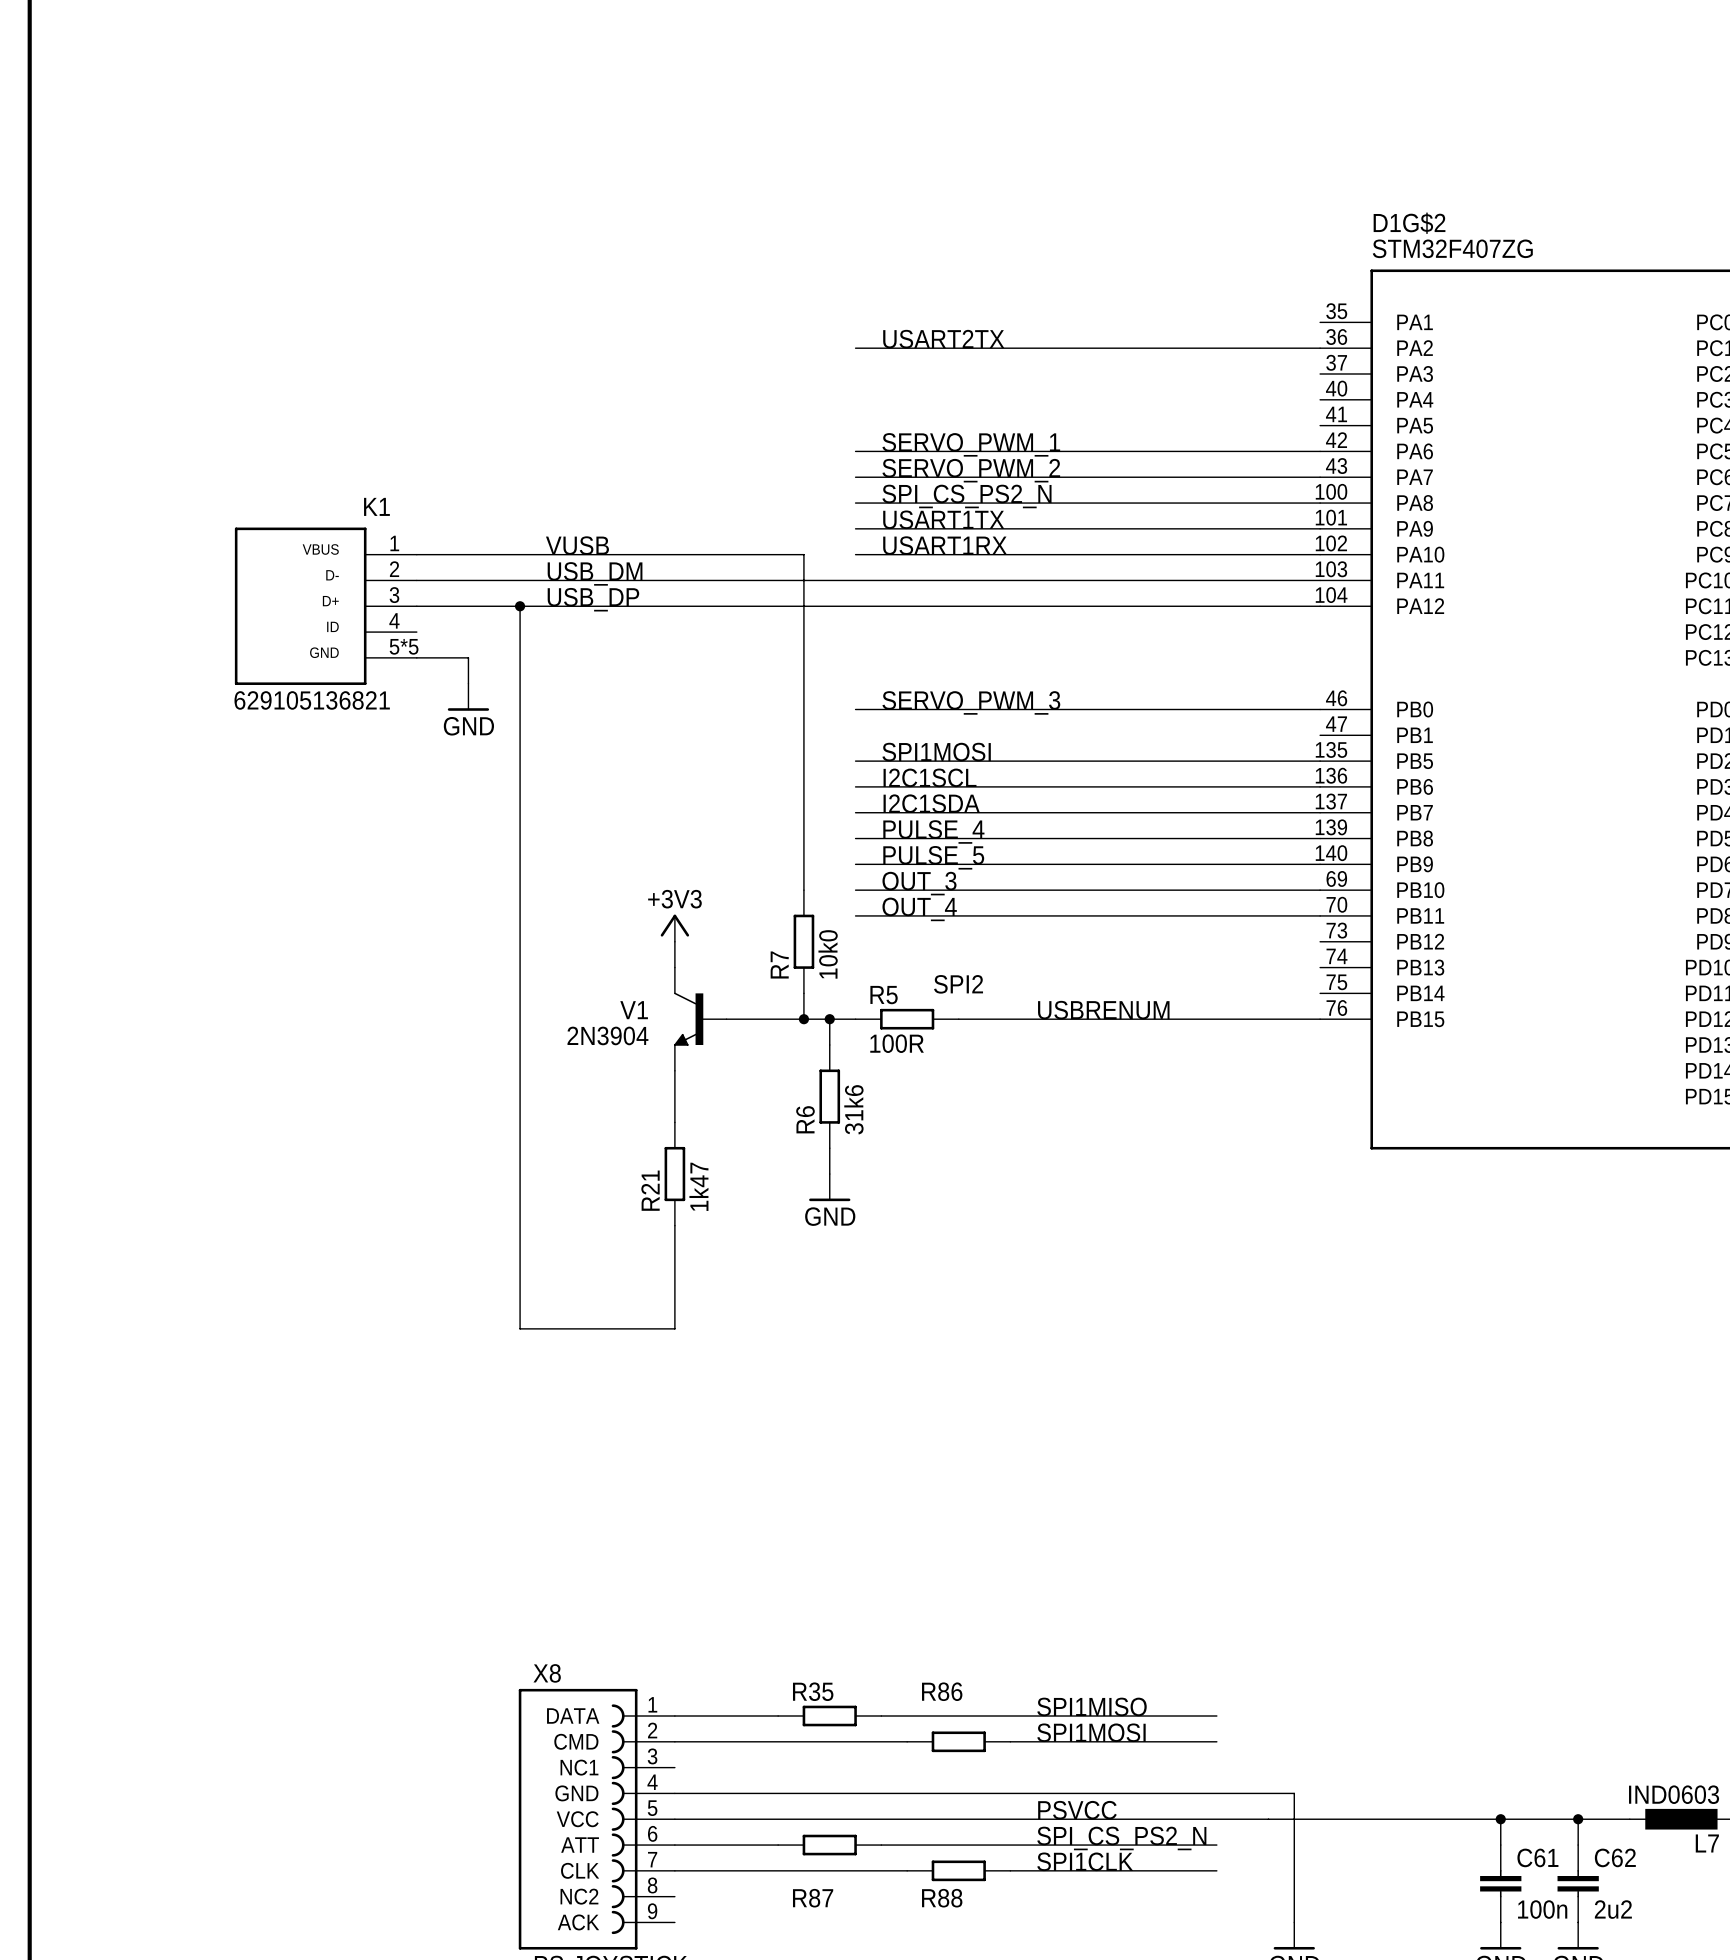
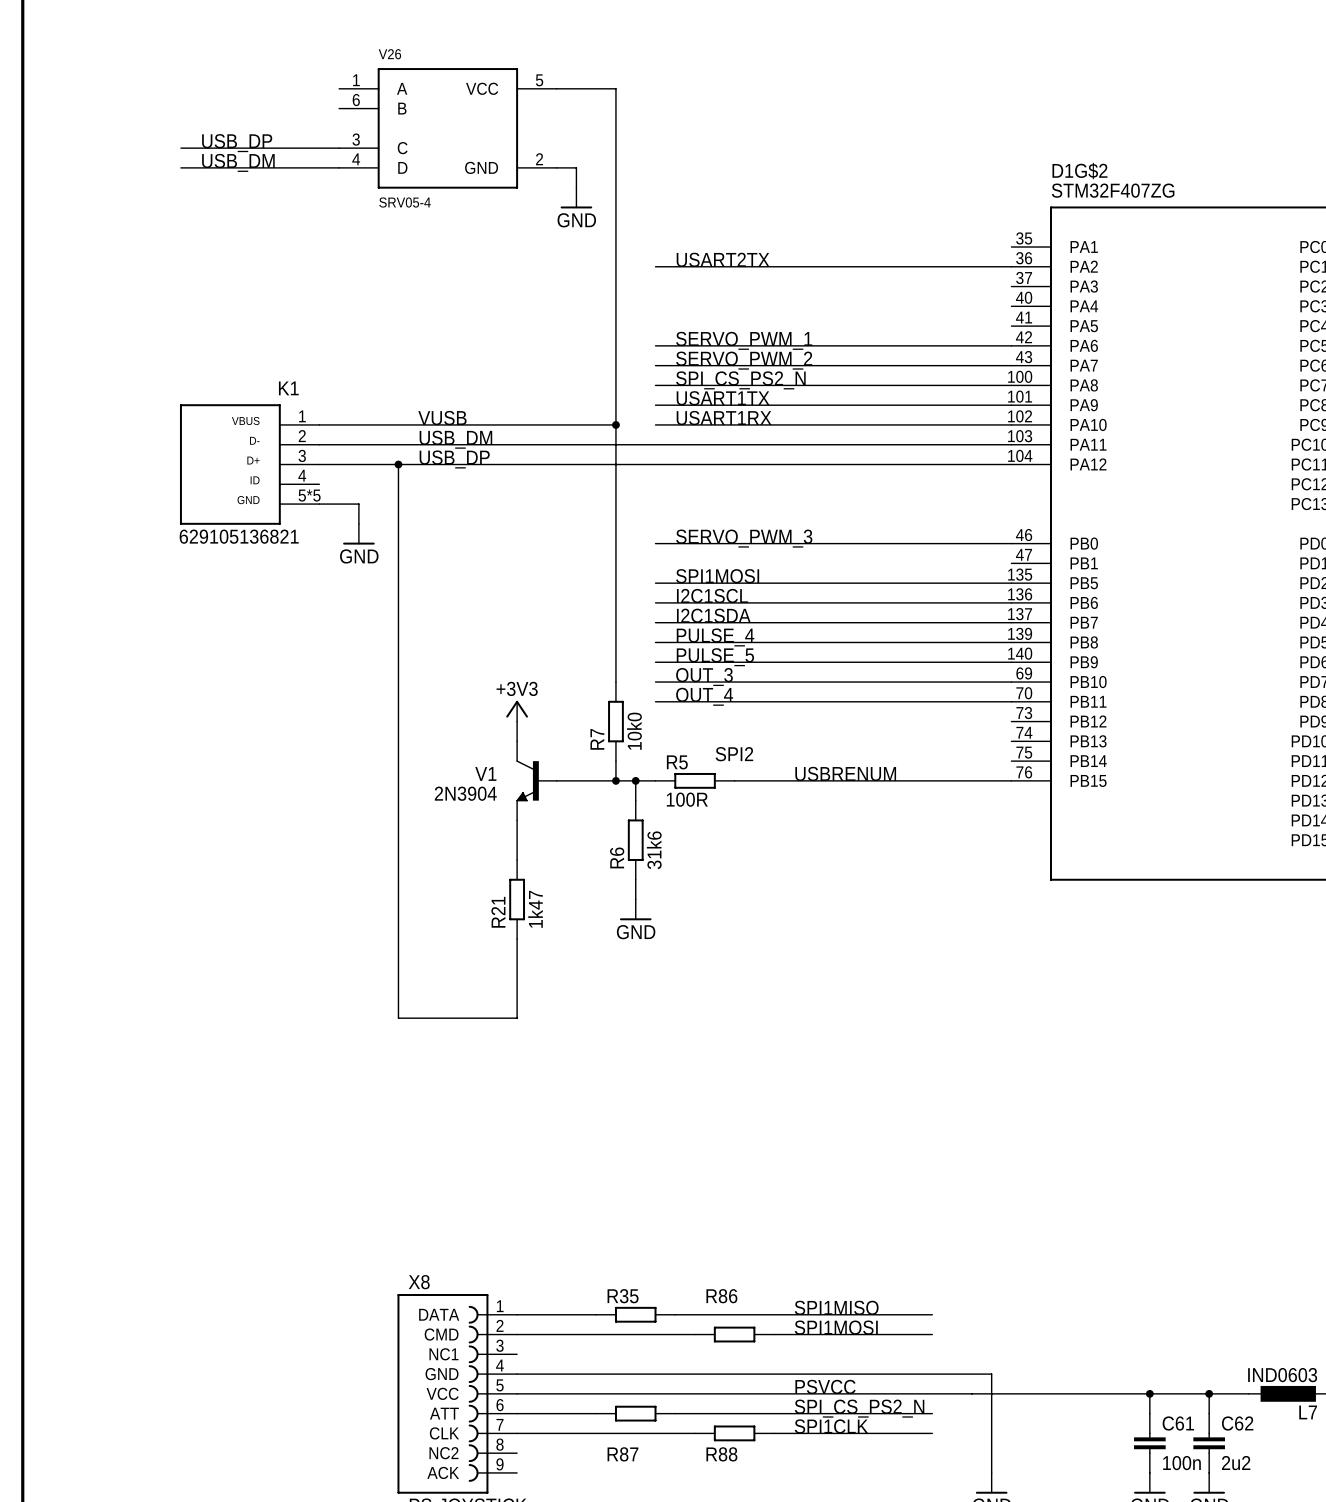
wire: none -> (556, 88) (615, 88) (615, 424)
V26: none -> SRV05-4 (447, 128)
label: none -> USB_DP (237, 143)
wire: none -> (180, 148) (339, 148)
label: none -> USB_DM (238, 162)
wire: none -> (180, 167) (339, 167)
wire: none -> (556, 167) (576, 167) (576, 187)
power symbol: none -> GND (576, 198)
junction: none -> (615, 424)

